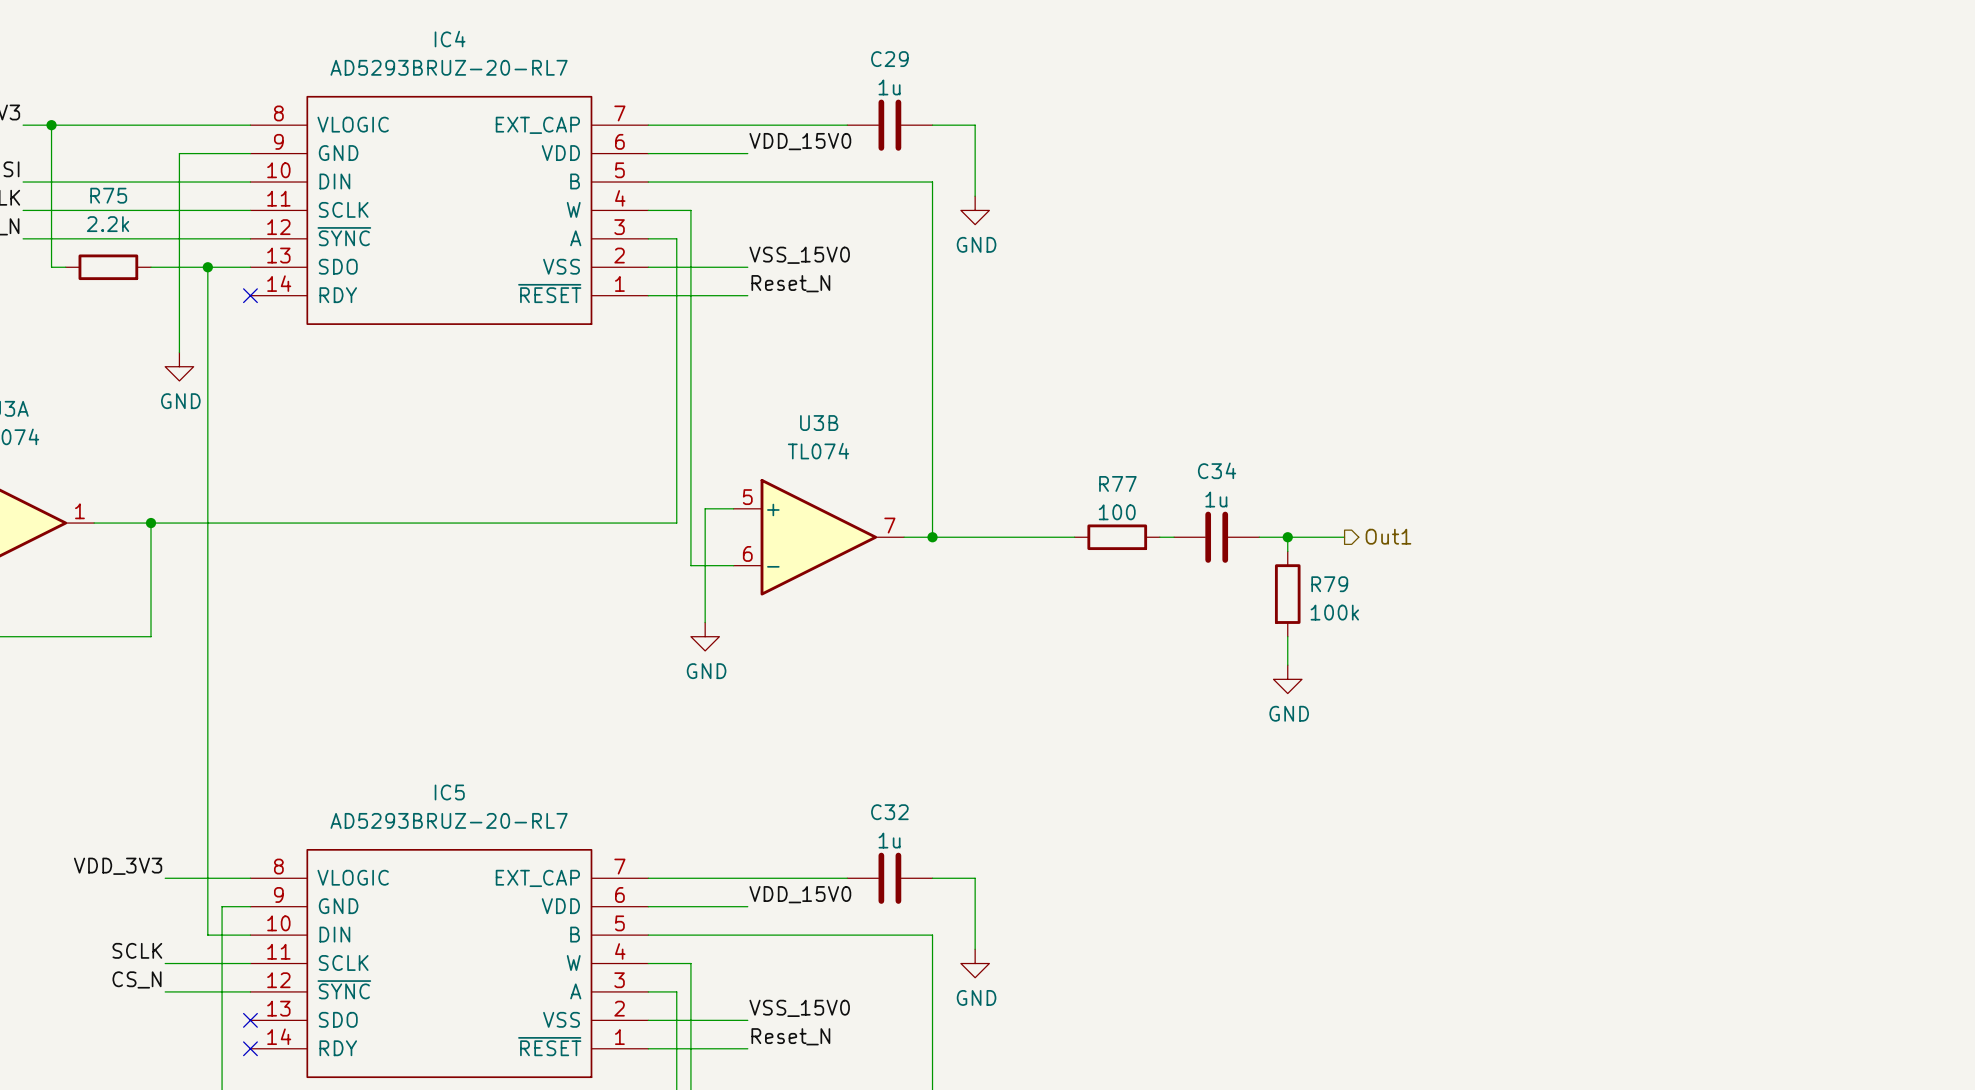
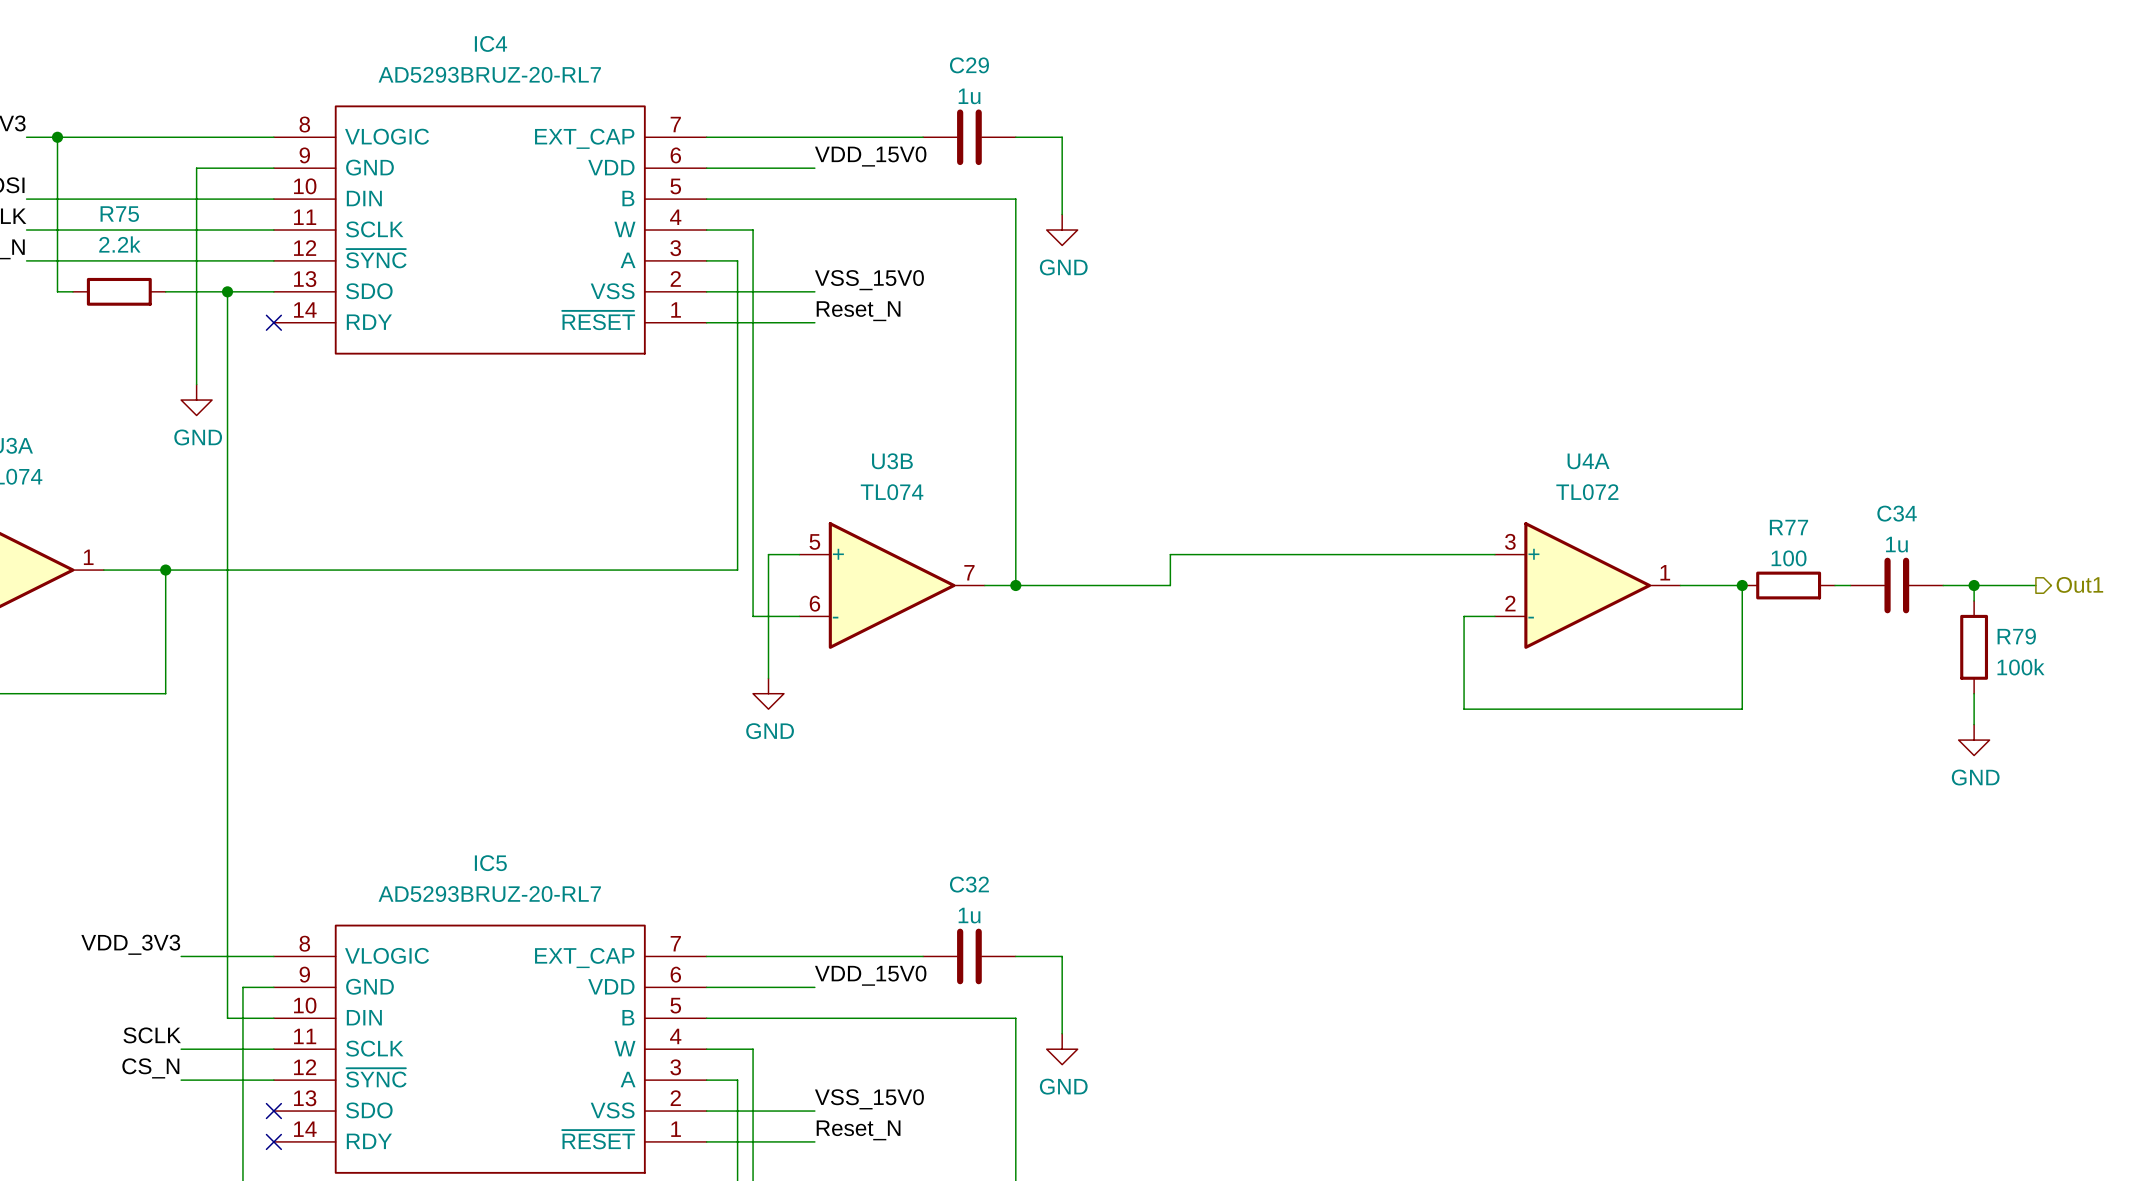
wire: none -> (1494, 554) (1170, 554) (1170, 585)
hierarchical label: Out1 (1388, 536) -> none
hierarchical label: none -> Out1 (2079, 584)
R77 position: (1117, 537) -> (1788, 585)
wire: (1159, 537) (1174, 537) -> none
C34 position: (1216, 537) -> (1896, 585)
wire: (1259, 537) (1344, 537) -> none
wire: (1287, 537) (1287, 551) -> none
junction: (1287, 537) -> none
U4A: none -> TL072 (1587, 585)
wire: none -> (1680, 585) (1742, 585) (1742, 709) (1464, 709) (1464, 616) (1494, 616)
junction: none -> (1742, 585)
wire: none -> (1835, 585) (1850, 585)
wire: none -> (1943, 585) (2035, 585)
wire: none -> (1974, 585) (1974, 600)
junction: none -> (1974, 585)
R79 position: (1287, 594) -> (1974, 647)
wire: (1287, 636) (1287, 665) -> none
wire: none -> (1974, 693) (1974, 724)
power symbol: GND (1287, 679) -> none
power symbol: none -> GND (1974, 740)

